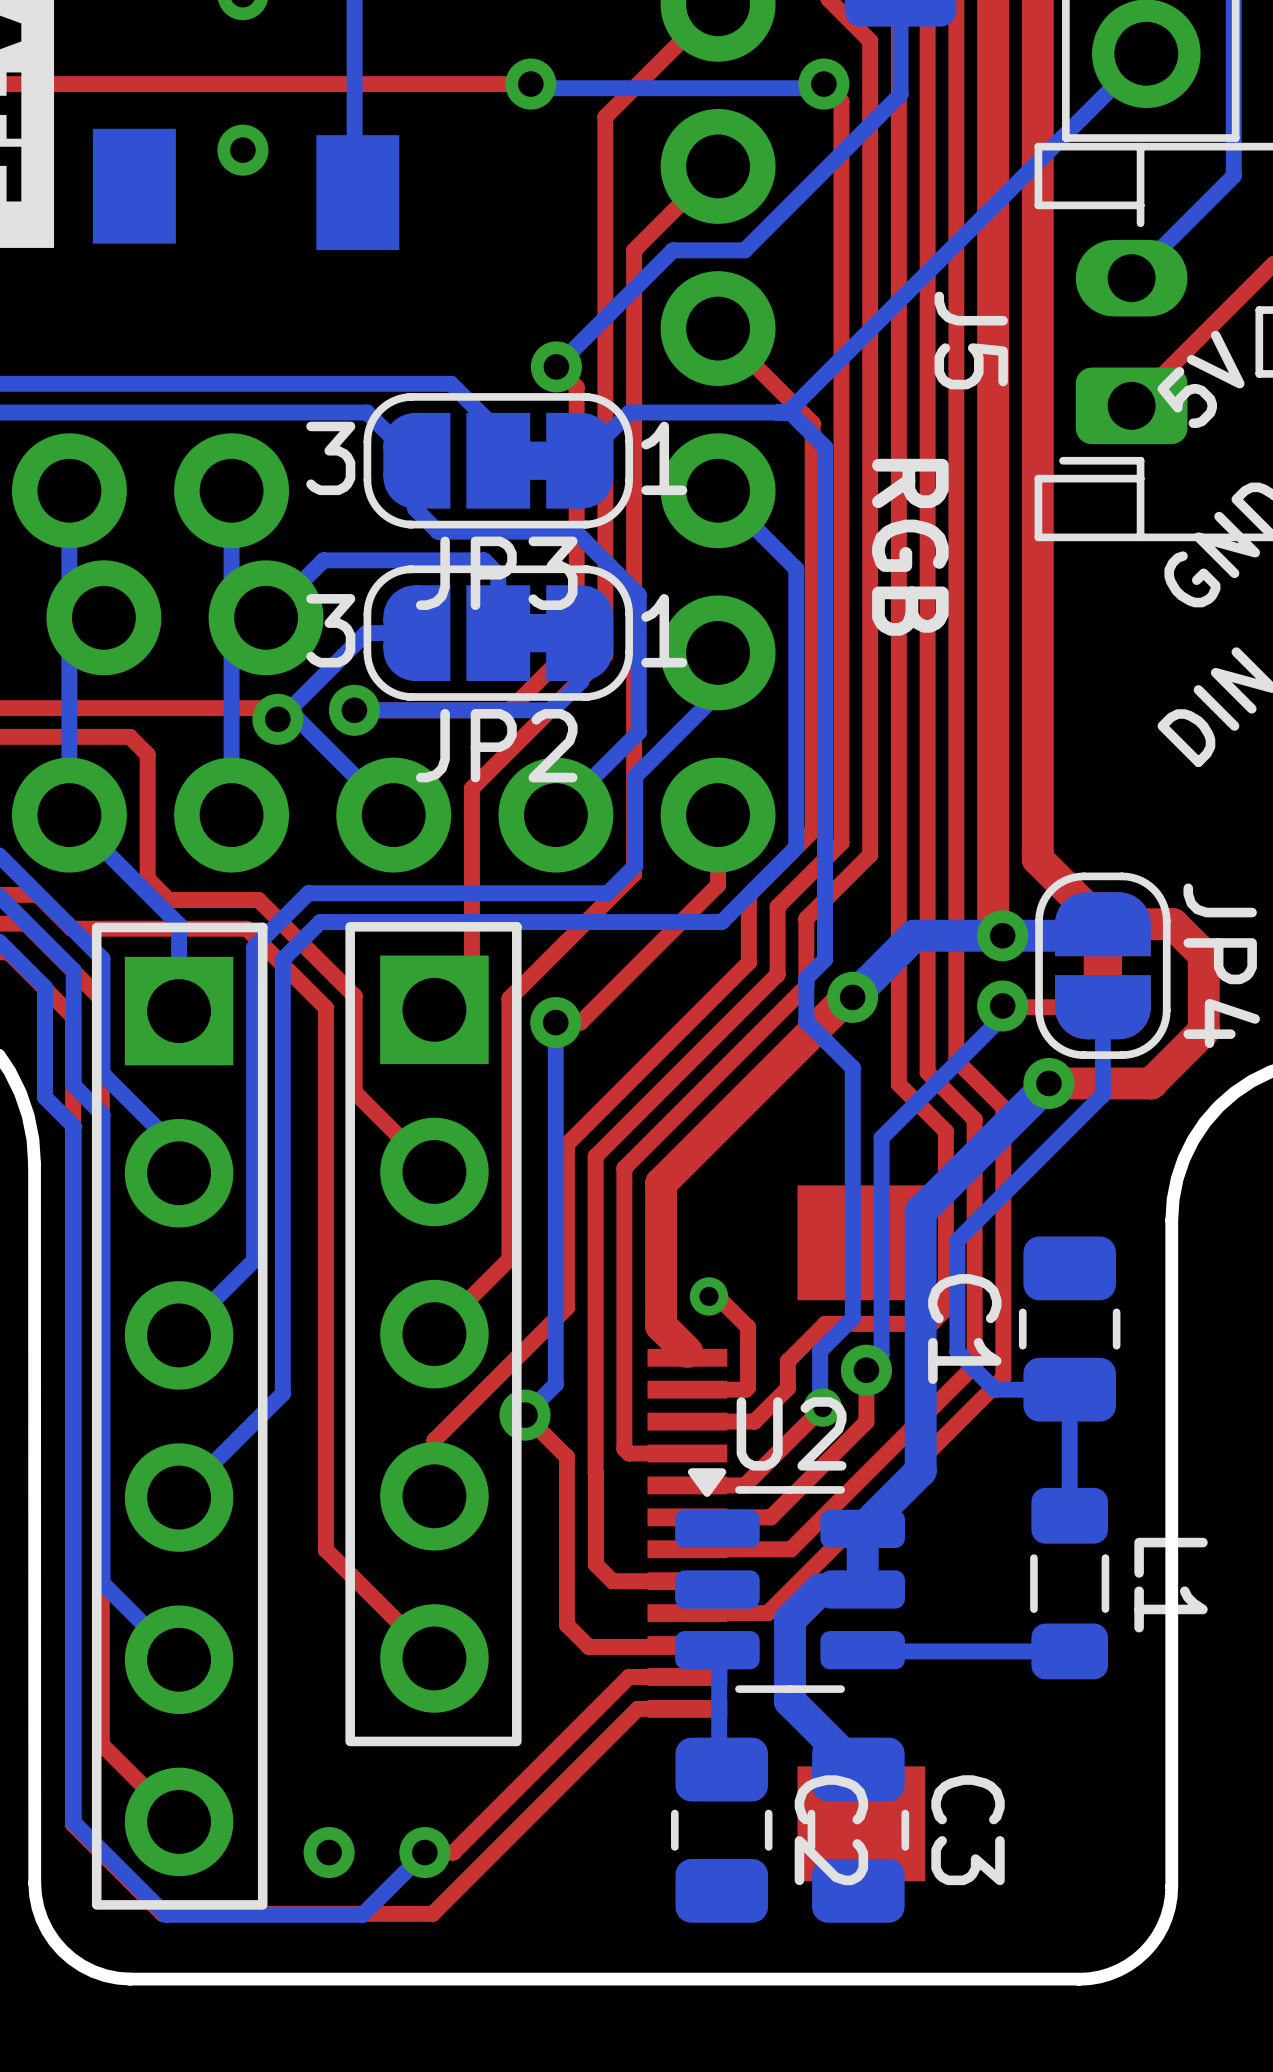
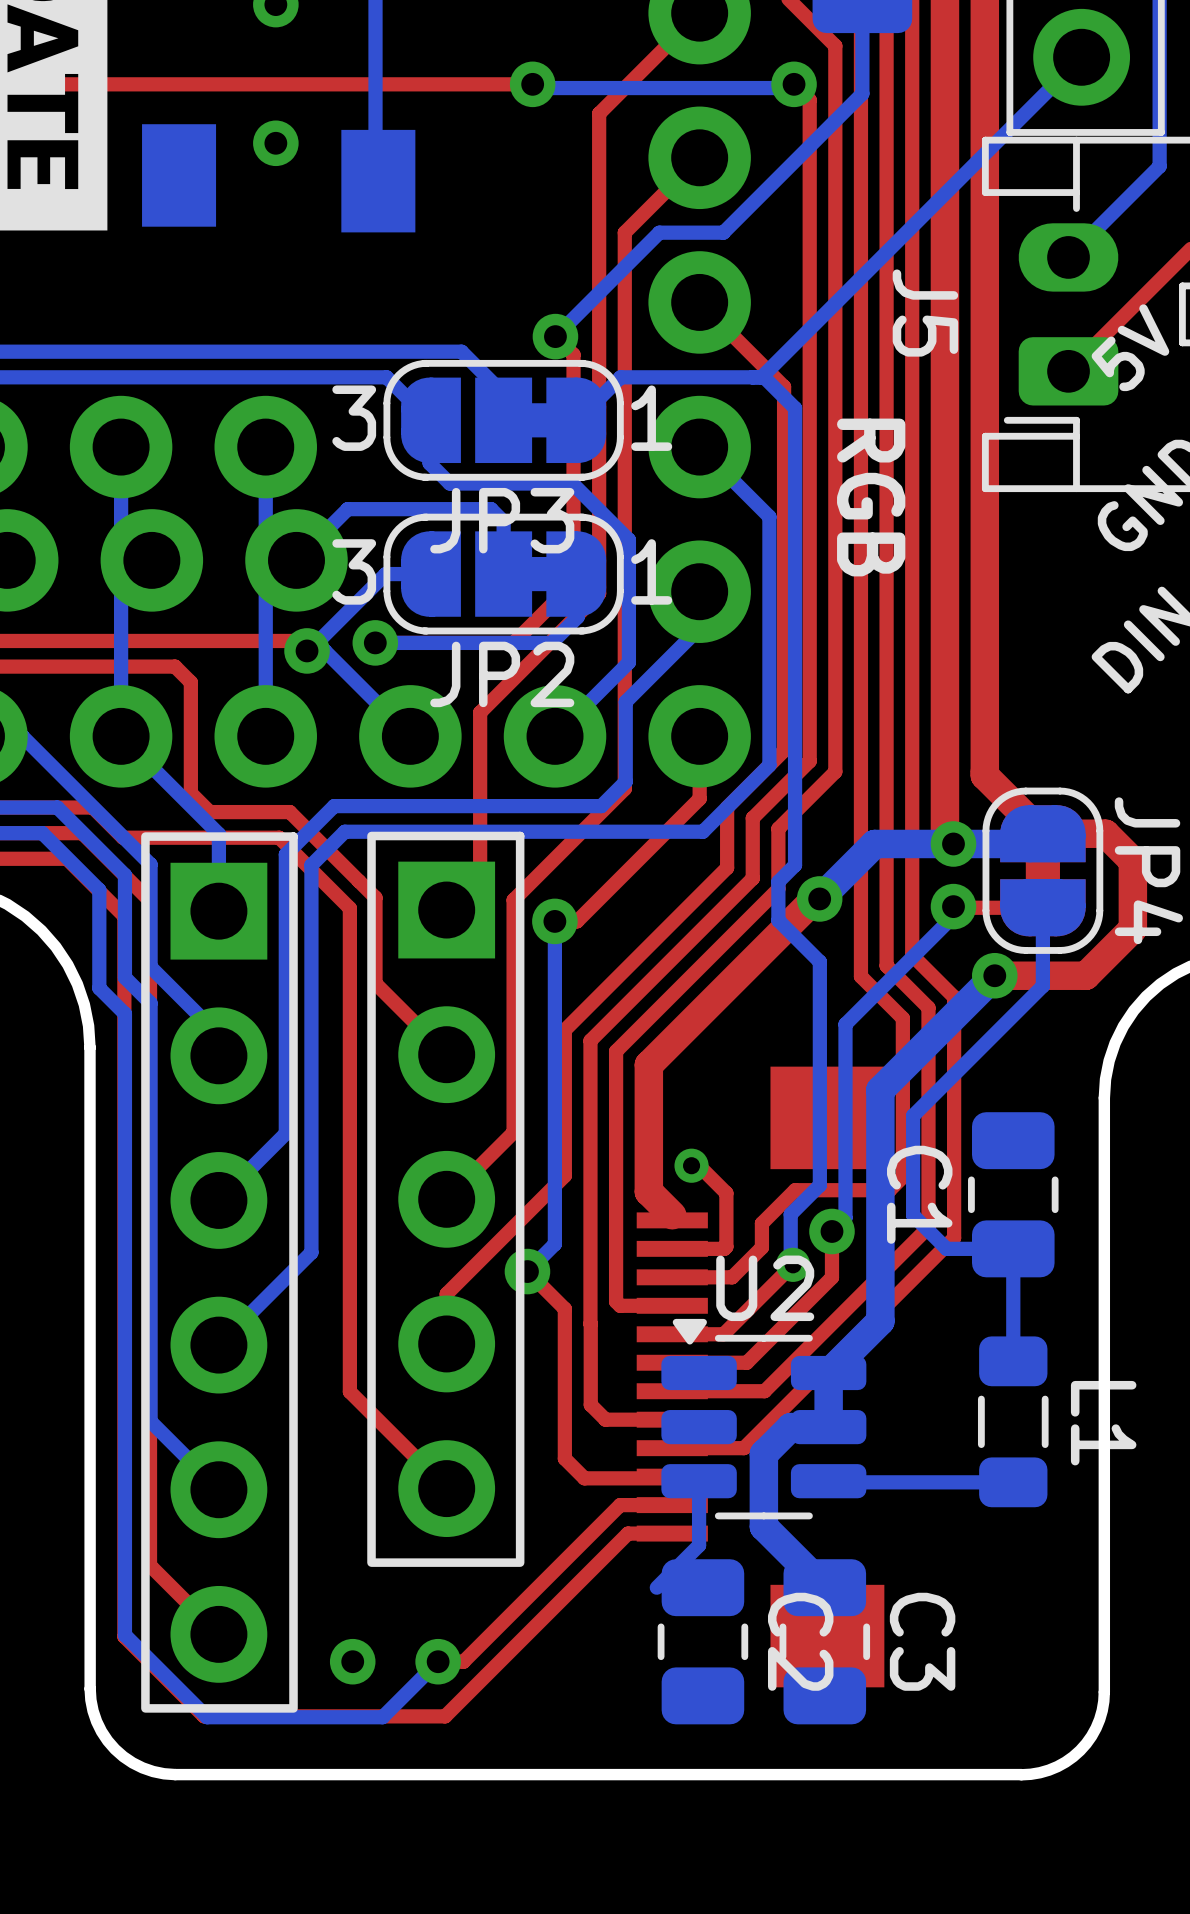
bottom track: (717, 1650) (719, 1651) (719, 1769) -> (699, 1481) (699, 1545) (656, 1587)

